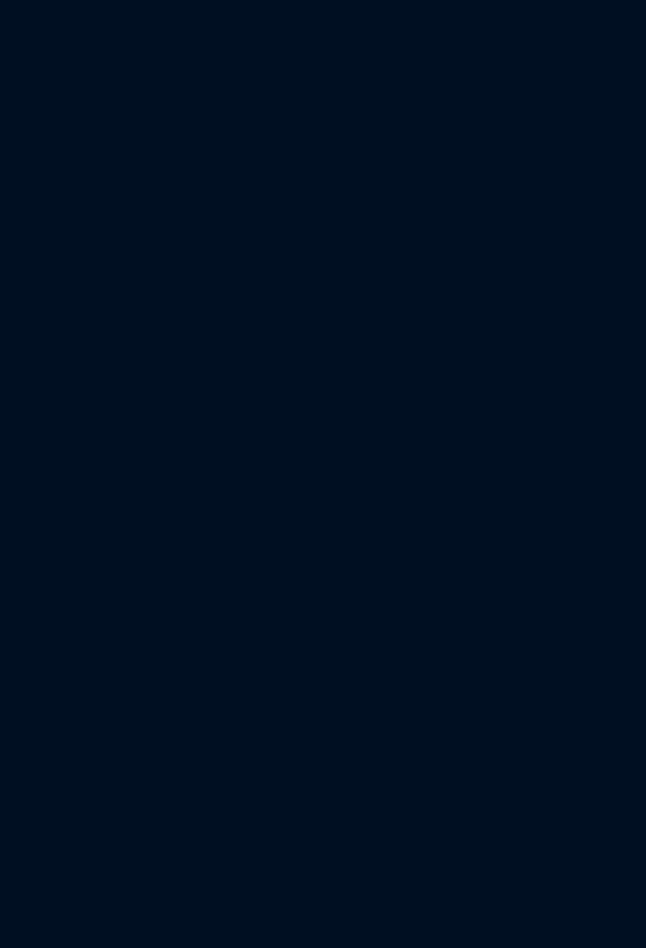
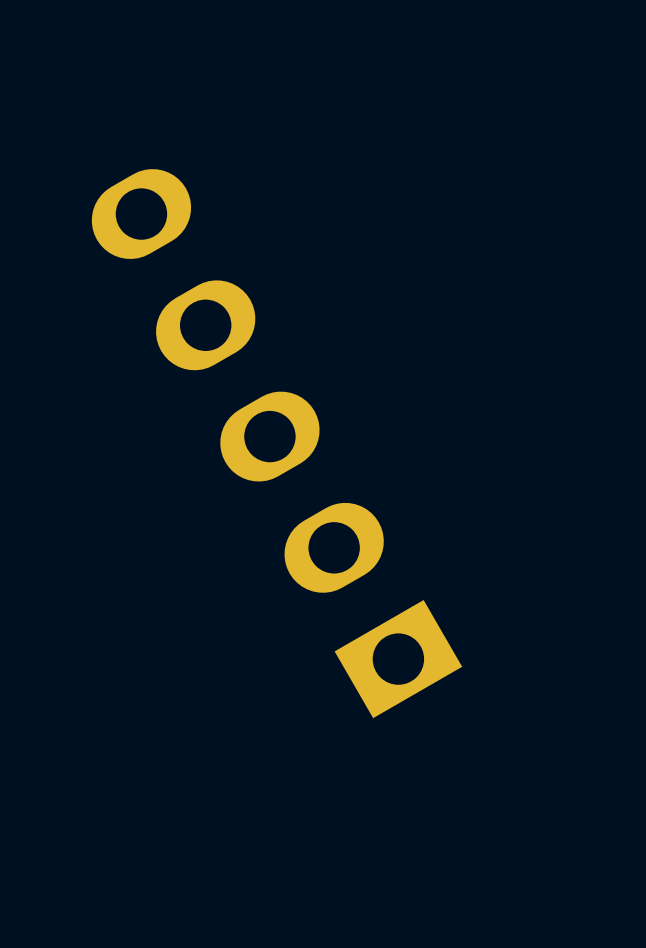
part: none -> (276, 443)

